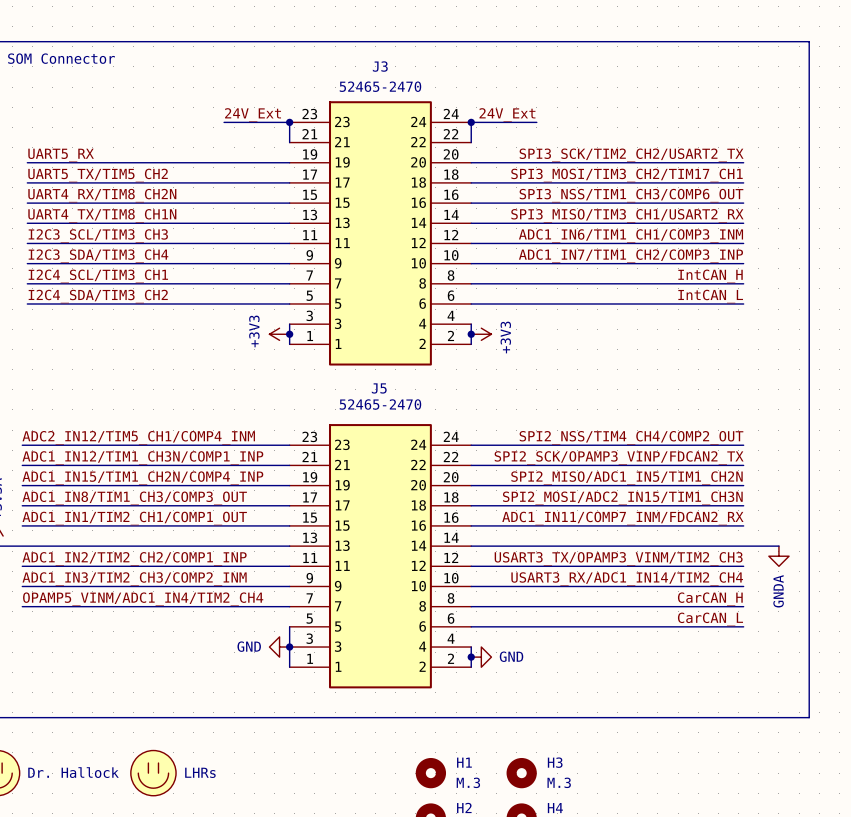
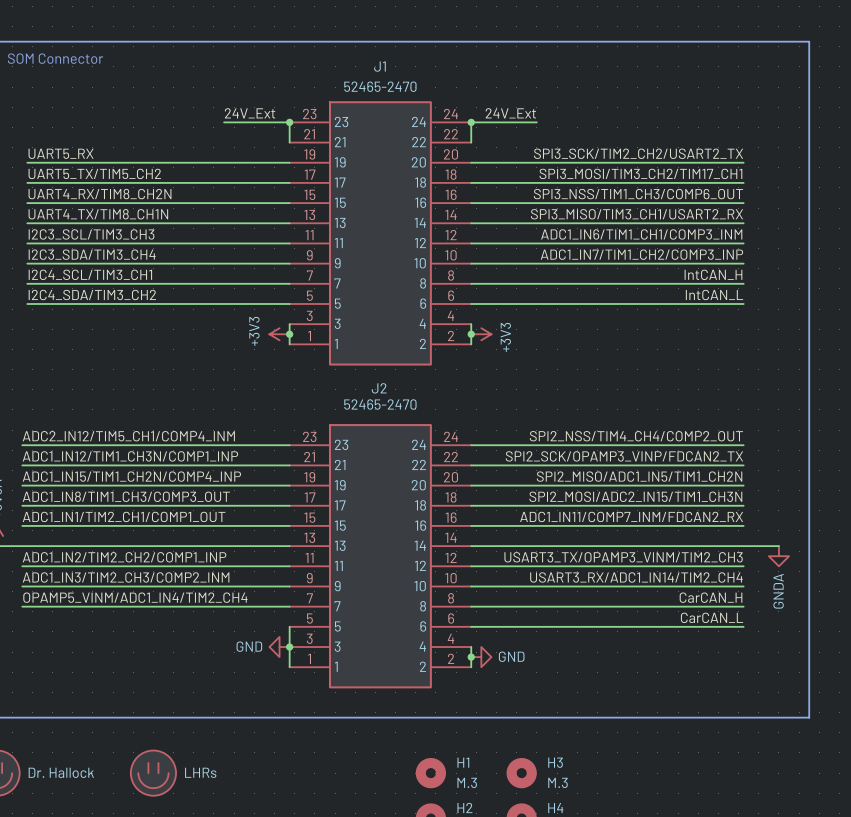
J3 name: J3 (380, 66) -> J1 (379, 66)
J5 name: J5 (379, 388) -> J2 (379, 388)

